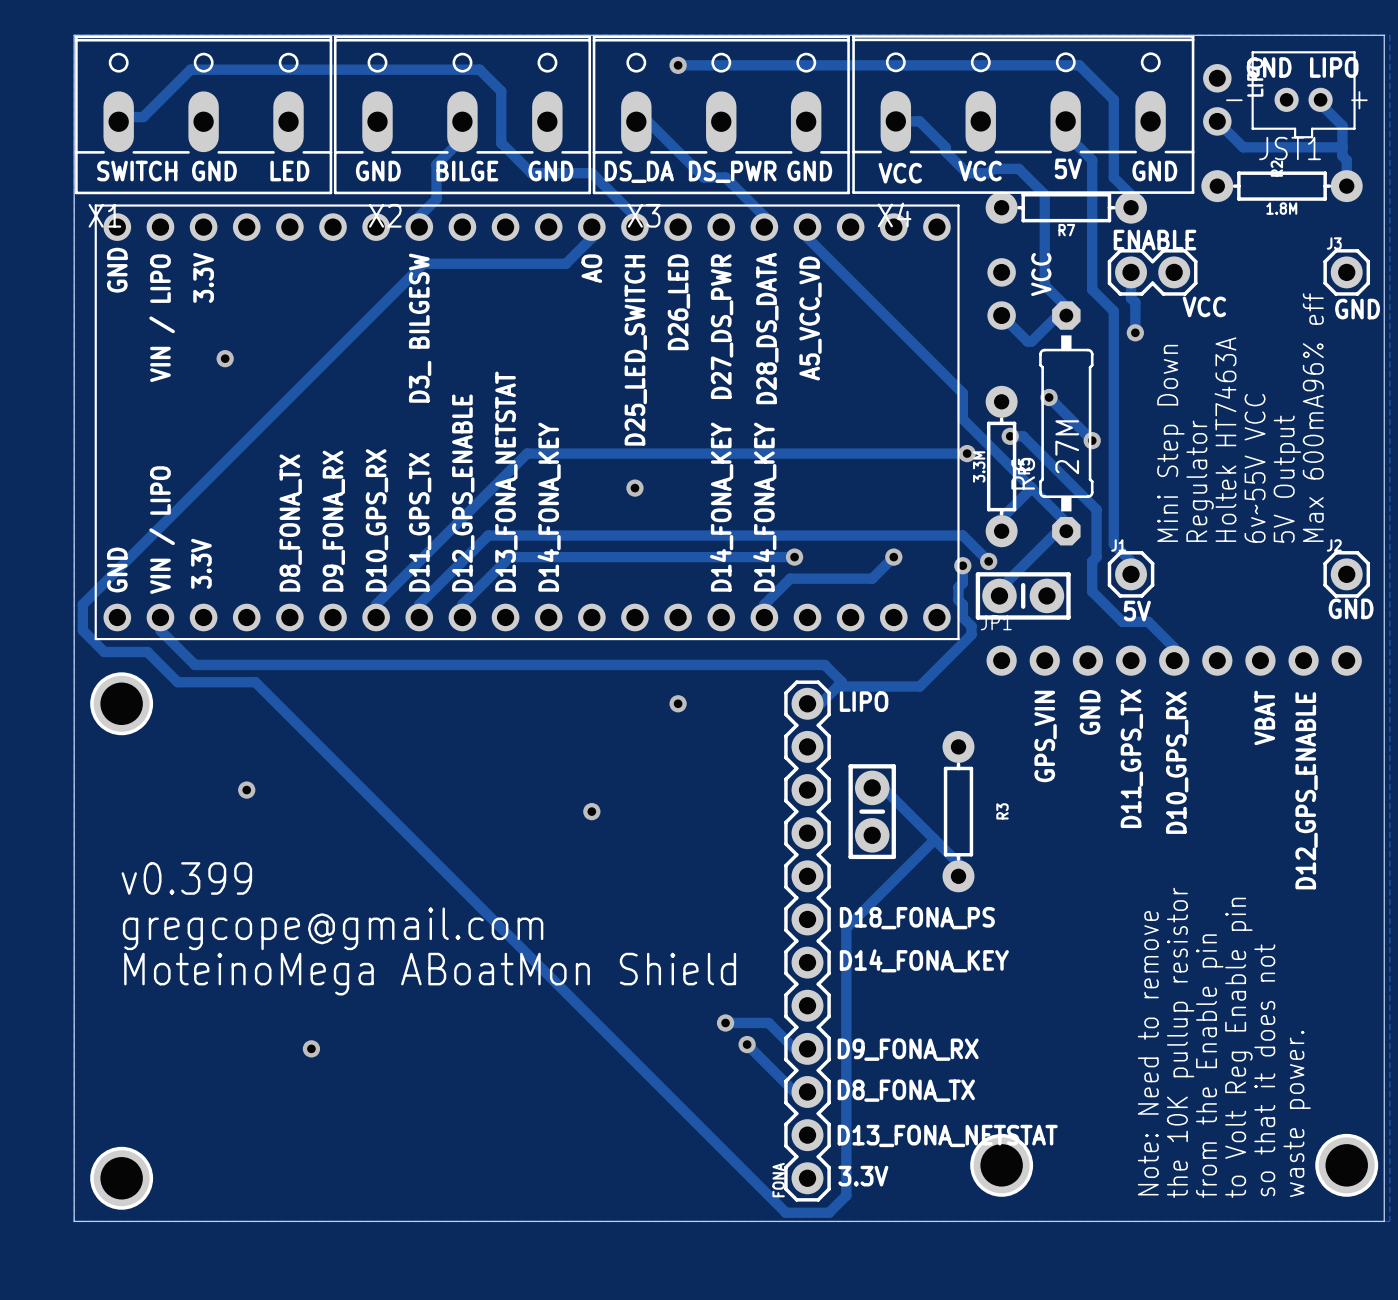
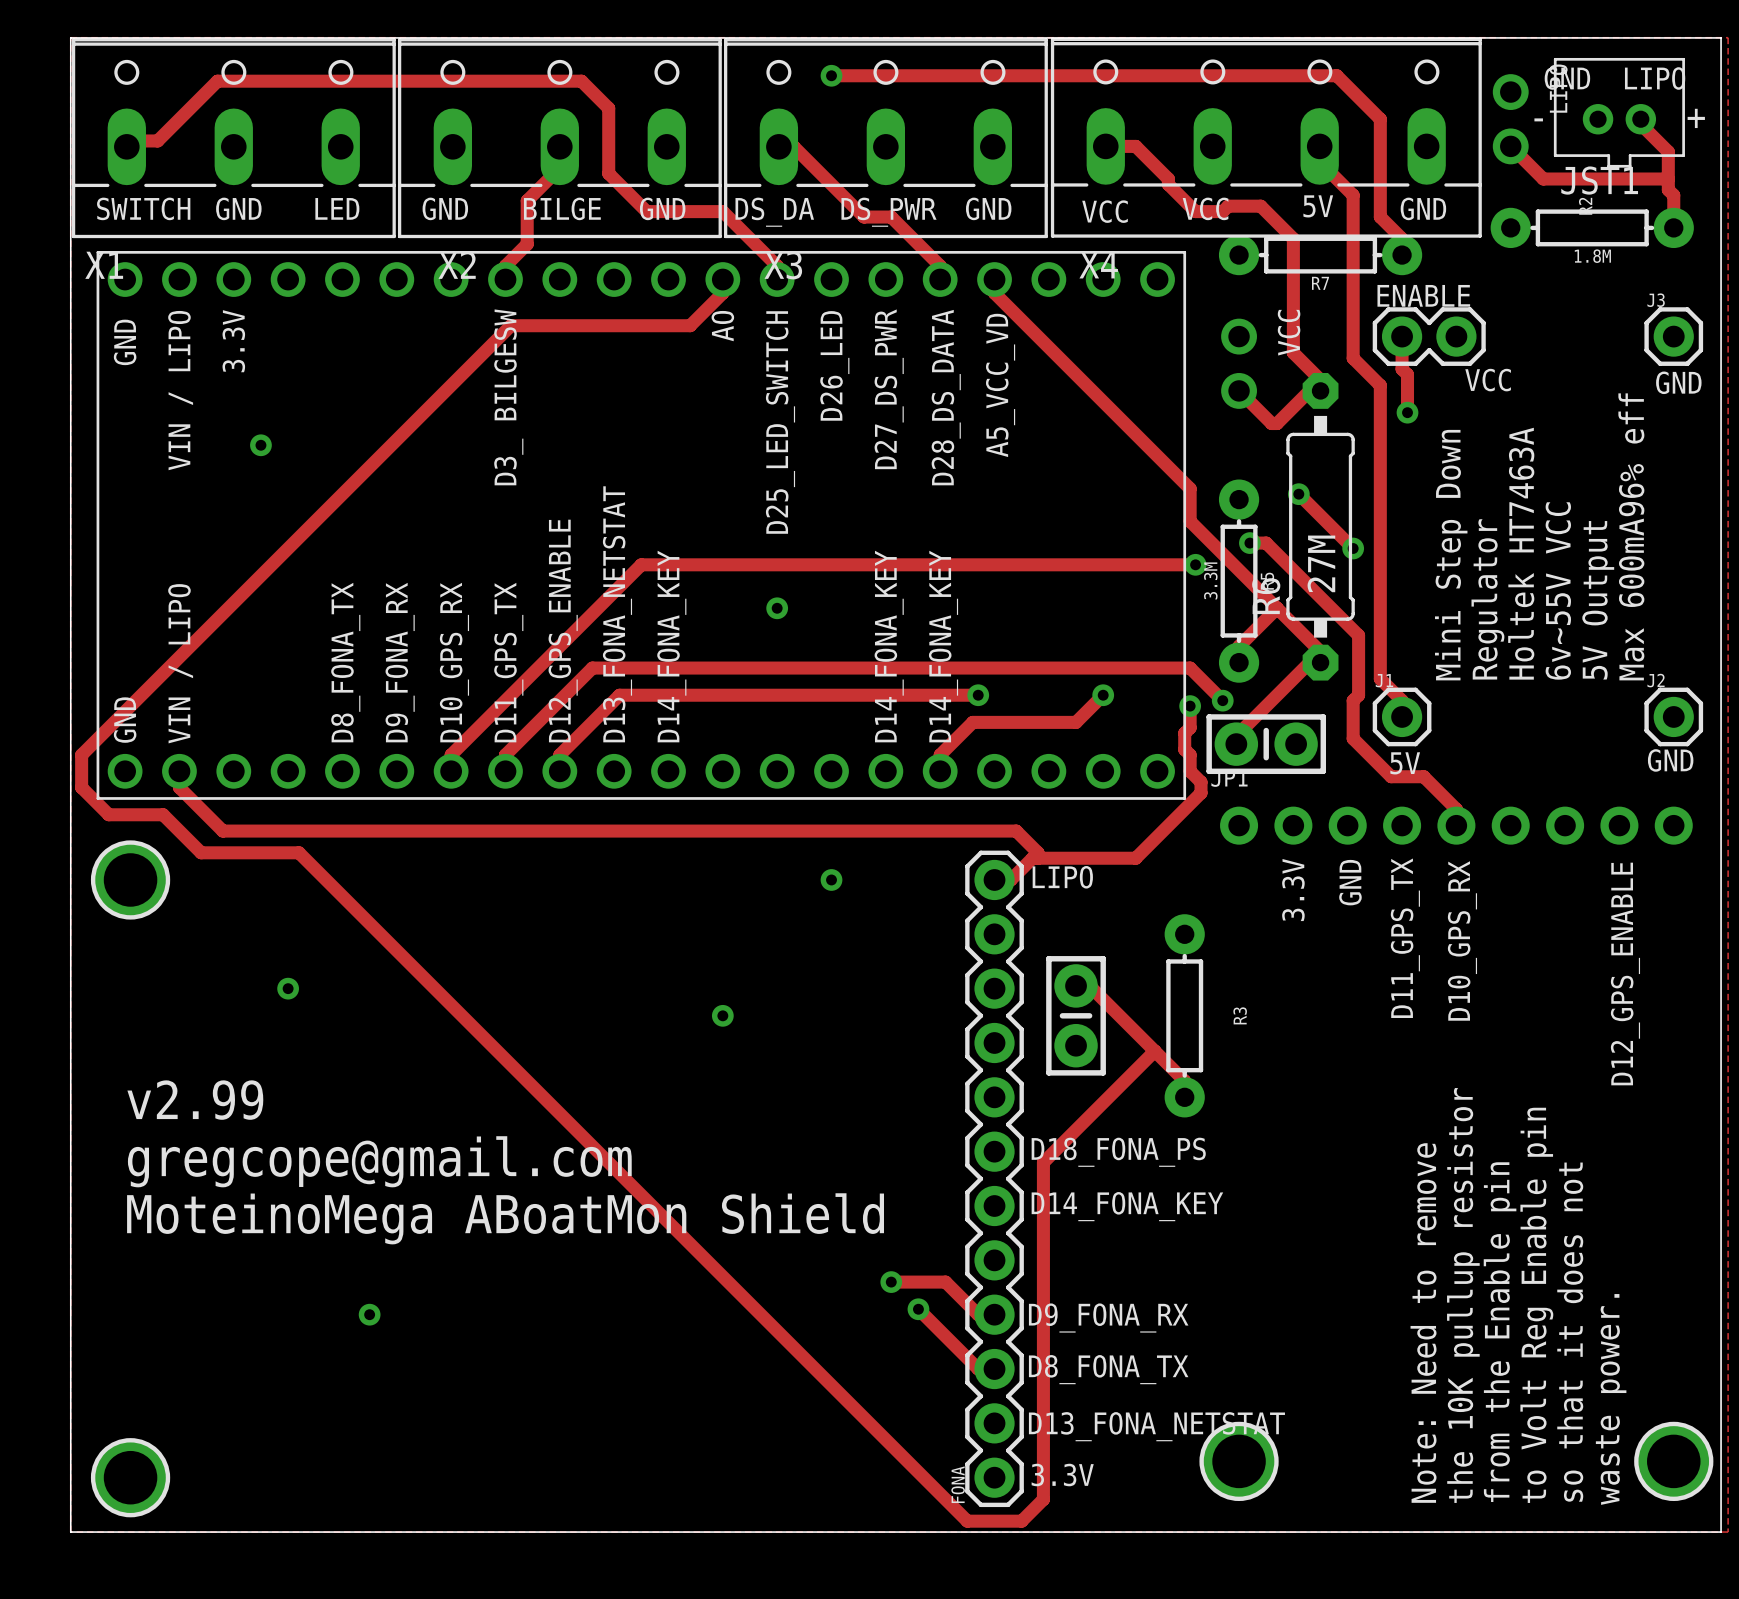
text: 3.3V (201, 563) -> none
text: VBAT (1264, 717) -> none
text: GPS_VIN (1045, 736) -> 3.3V (1293, 890)
text: v0.399 (186, 878) -> v2.99 (195, 1100)

